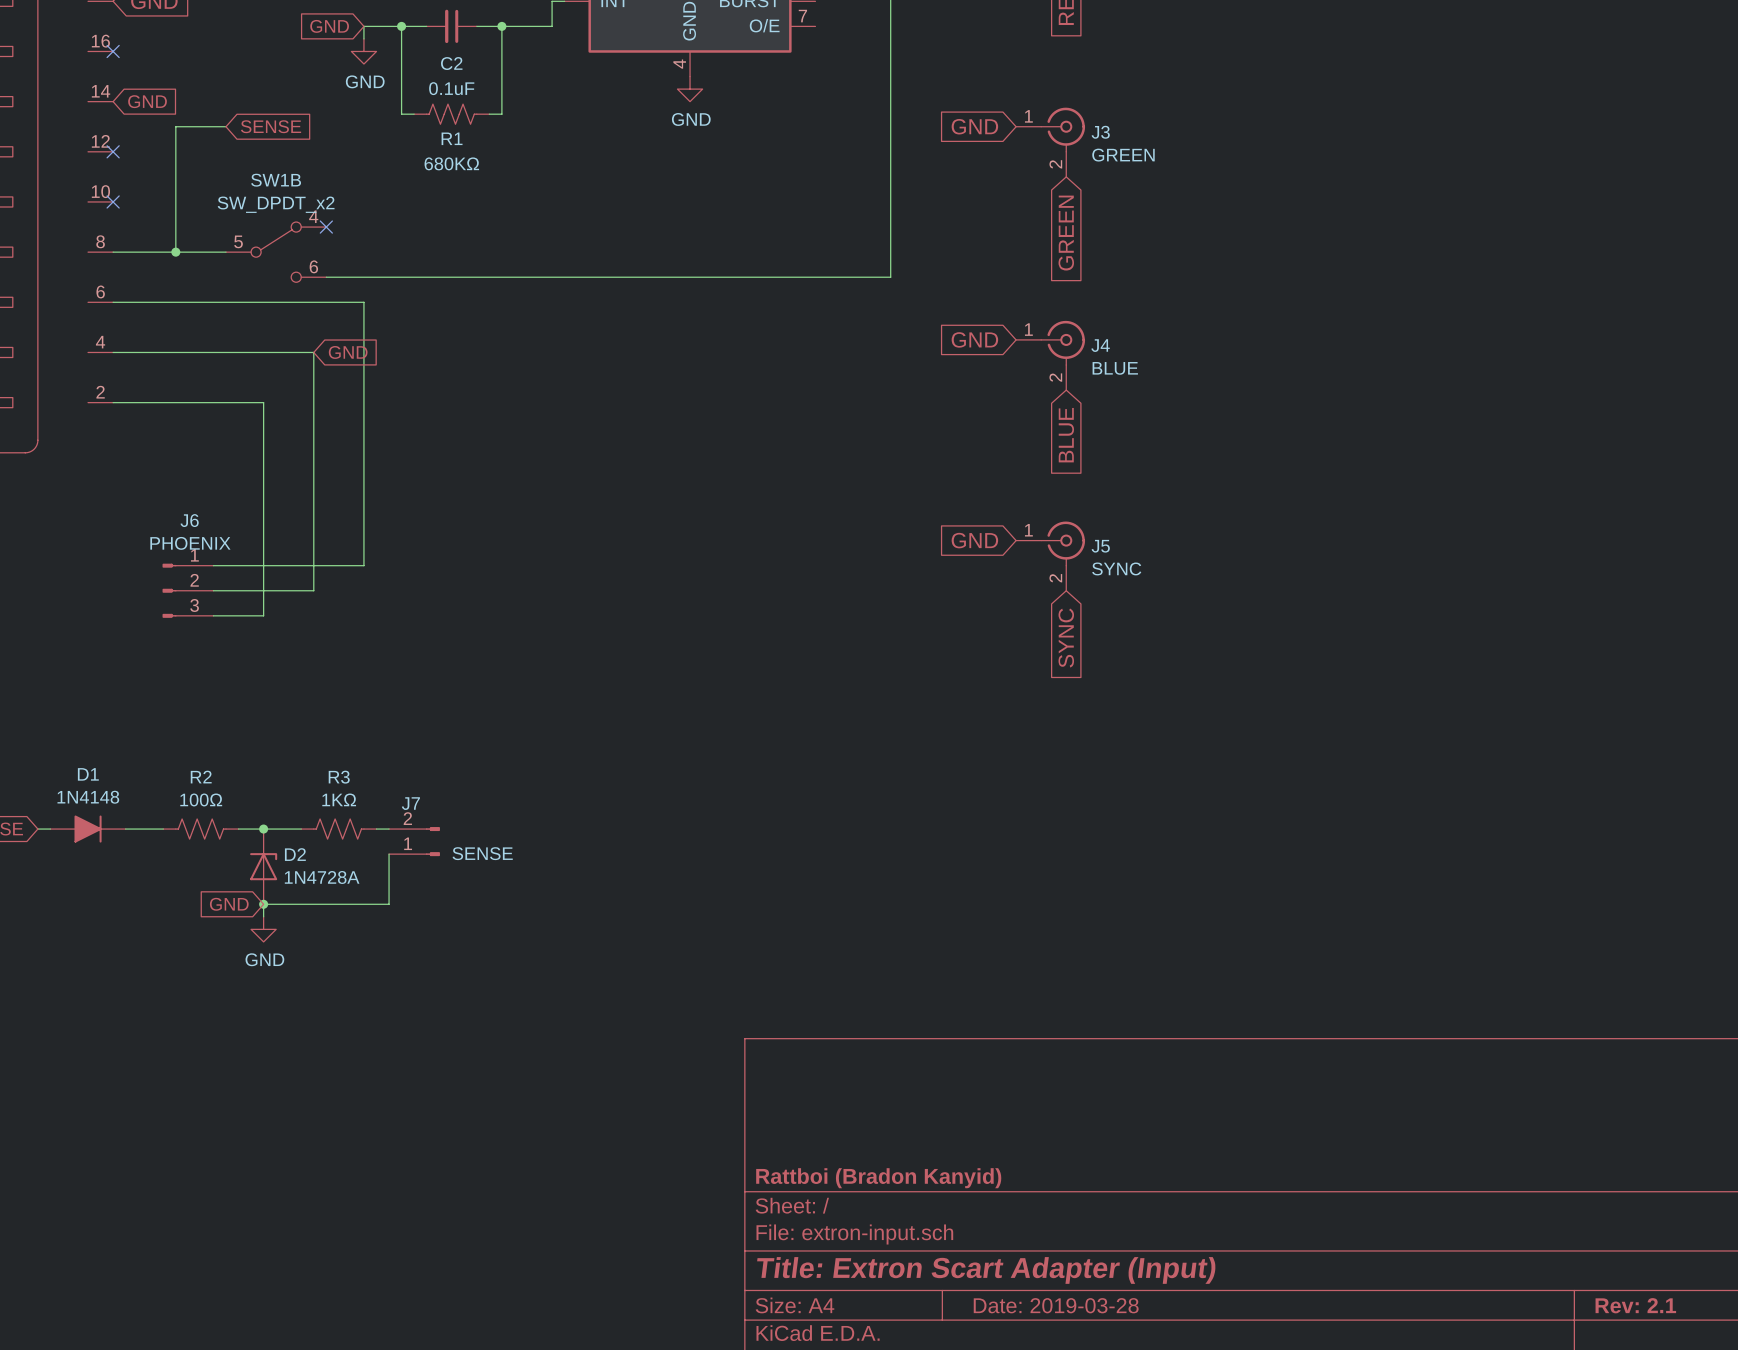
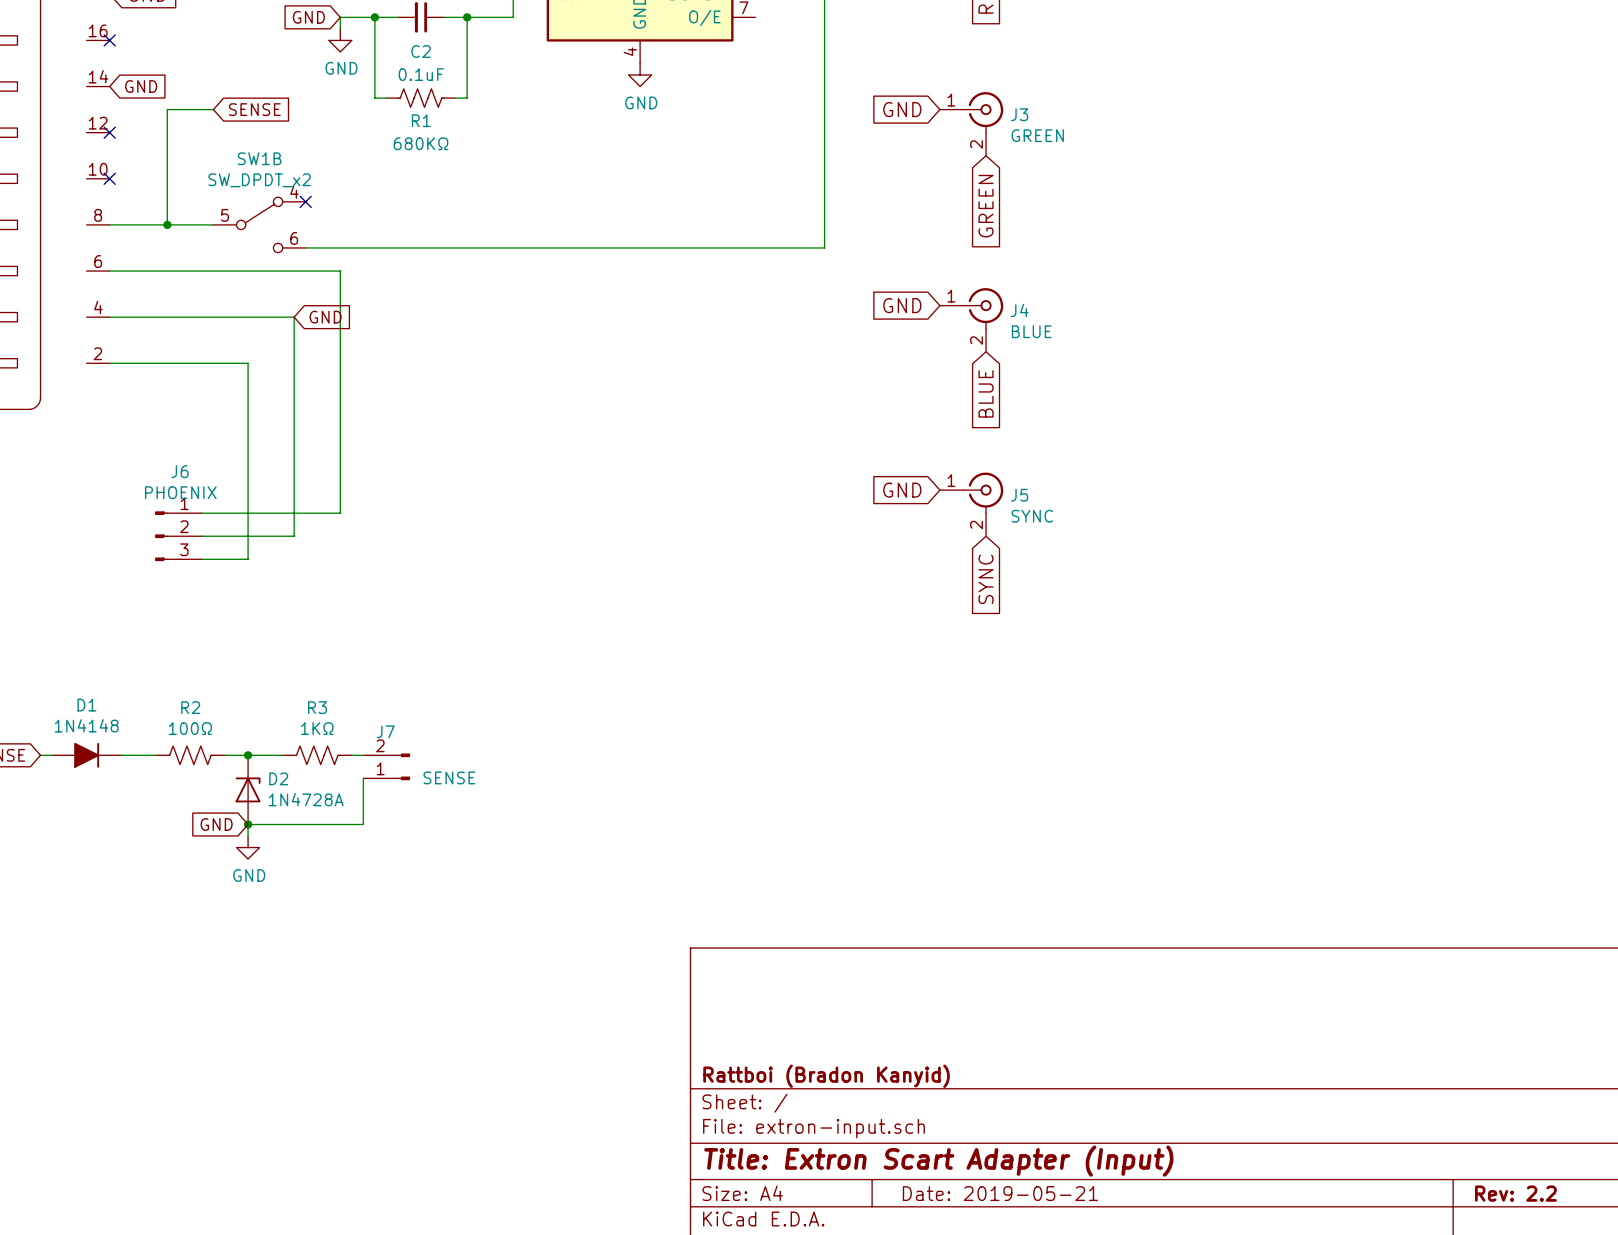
title block: Date: 2019-03-28 (1056, 1305) -> Date: 2019-05-21 (1000, 1193)
title block: Rev: 2.1 (1635, 1305) -> Rev: 2.2 (1515, 1193)

